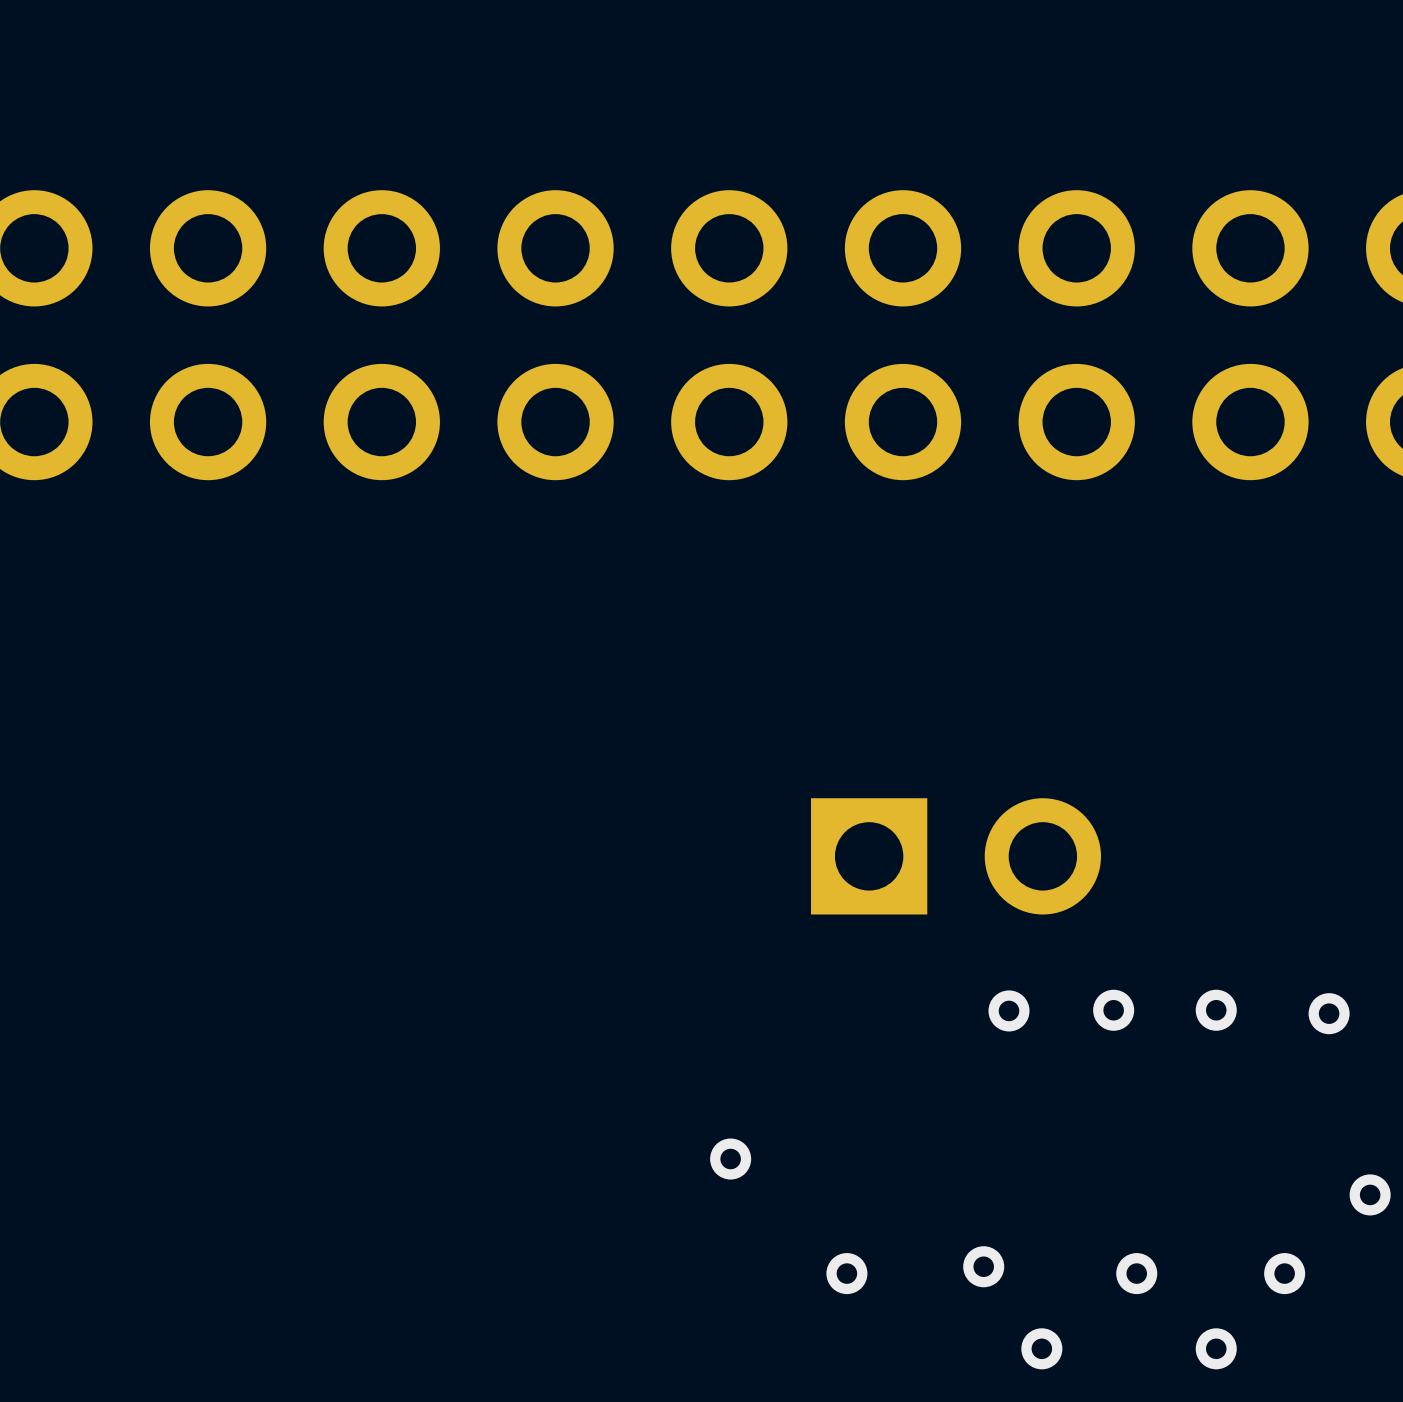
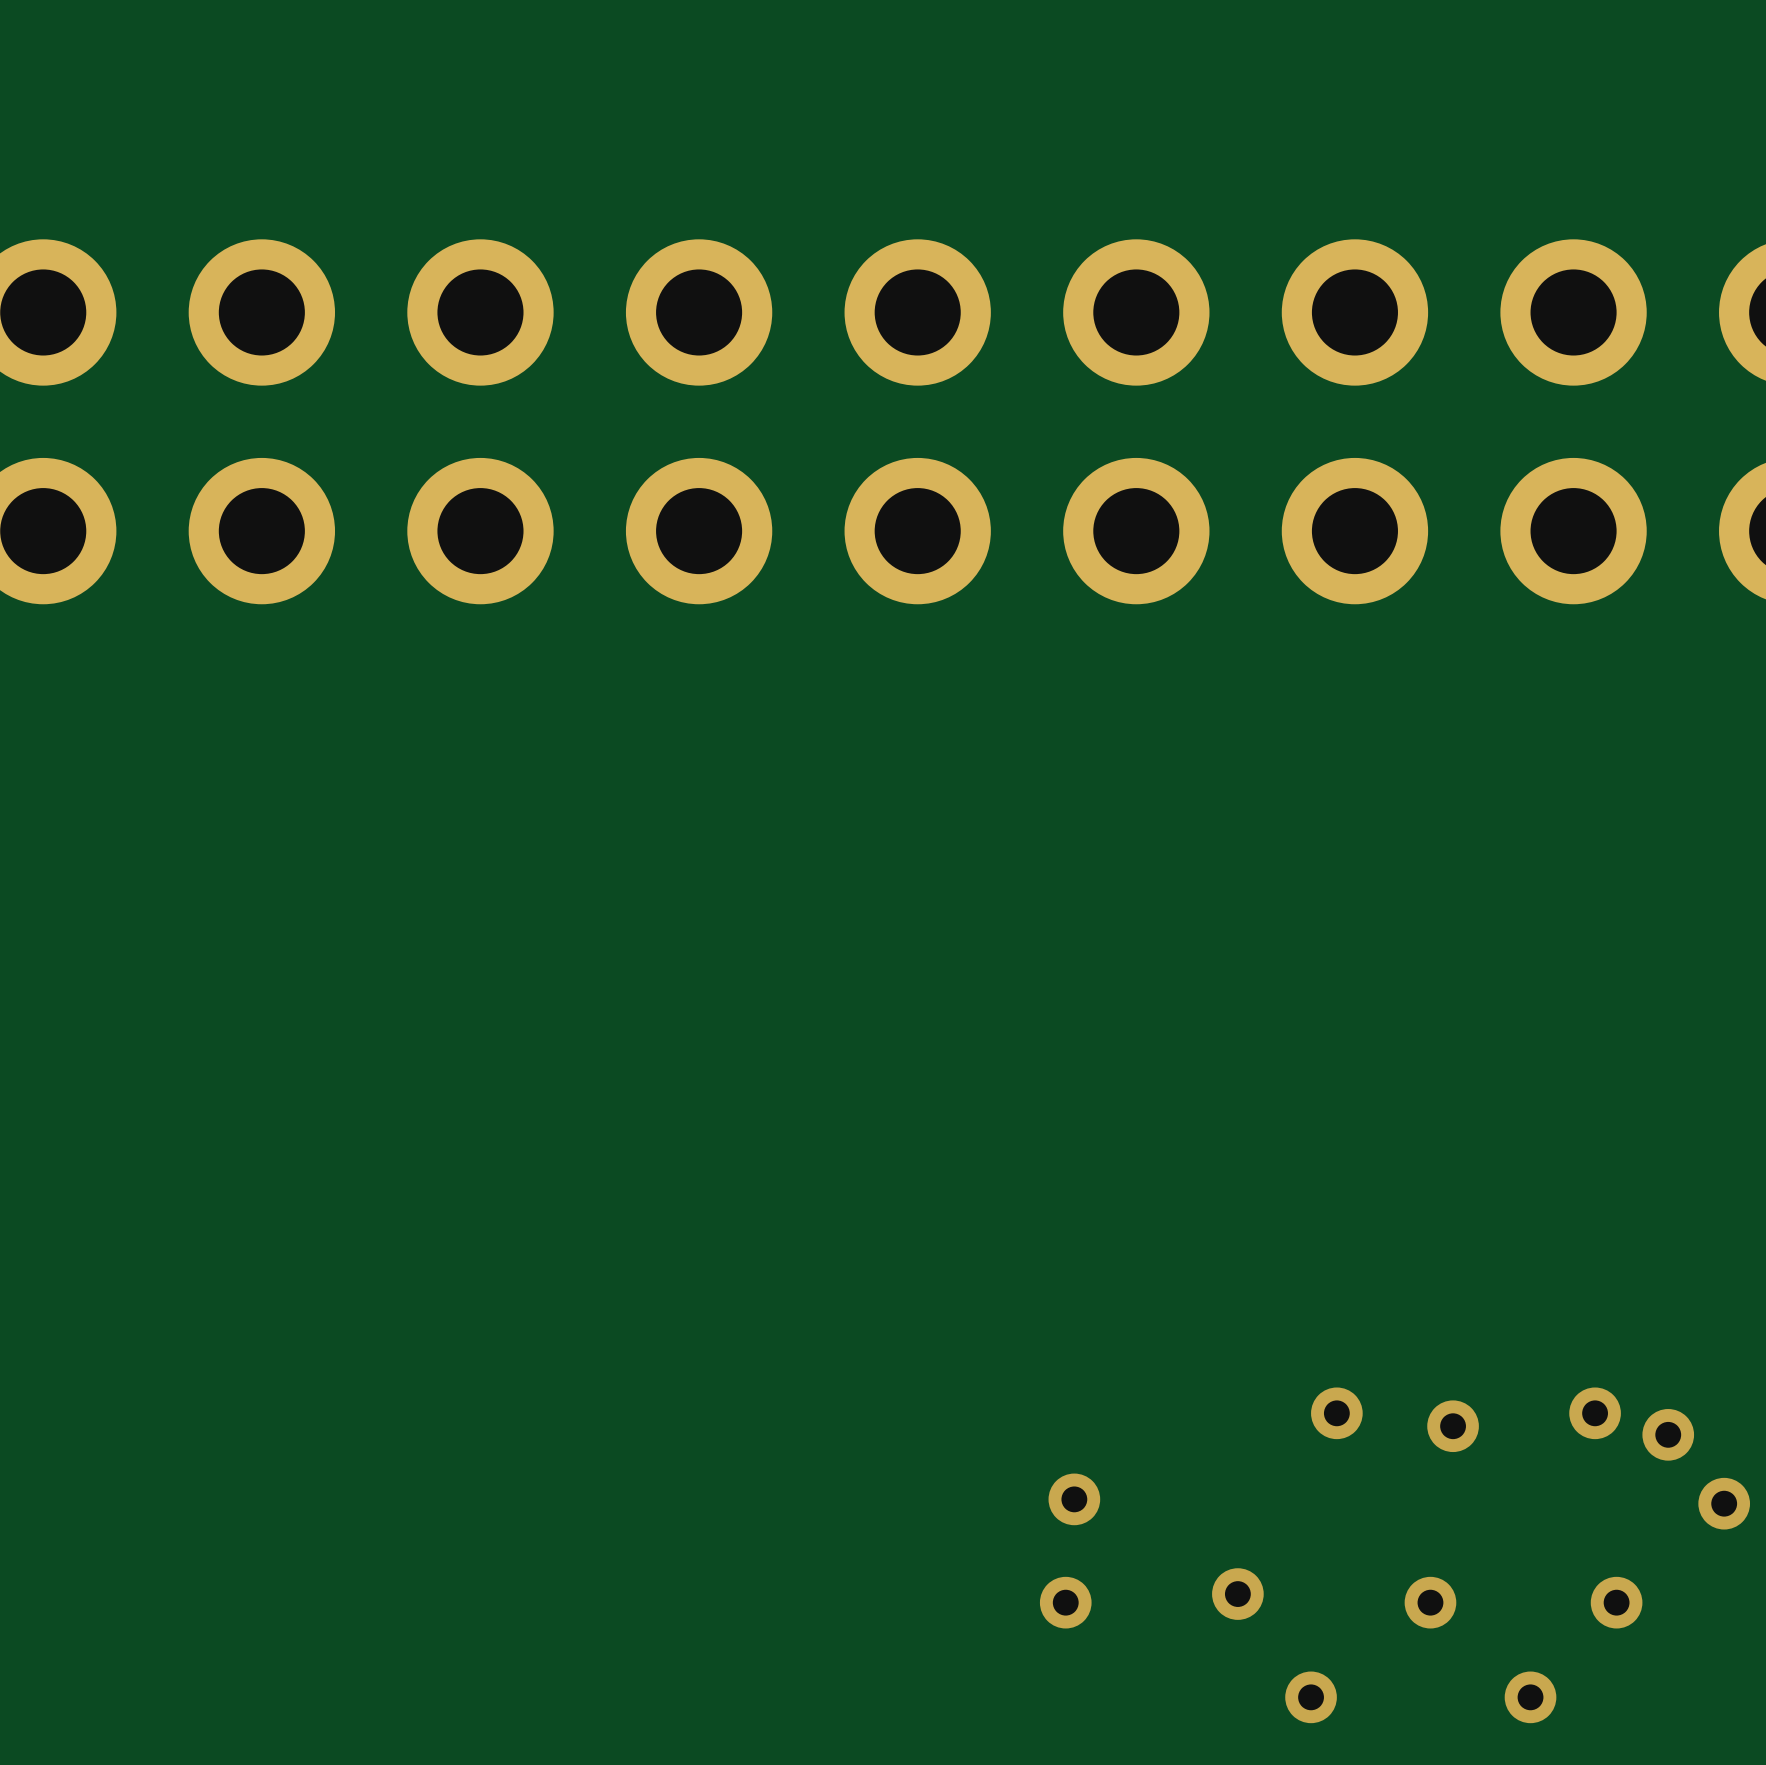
part: (956, 856) -> none
via: (1009, 1010) -> none
via: (1113, 1010) -> none
via: (1216, 1010) -> none
via: (1329, 1013) -> none
via: none -> (1336, 1413)
via: none -> (1595, 1413)
via: none -> (1453, 1426)
via: none -> (1668, 1434)
via: (730, 1159) -> none
via: none -> (1074, 1499)

